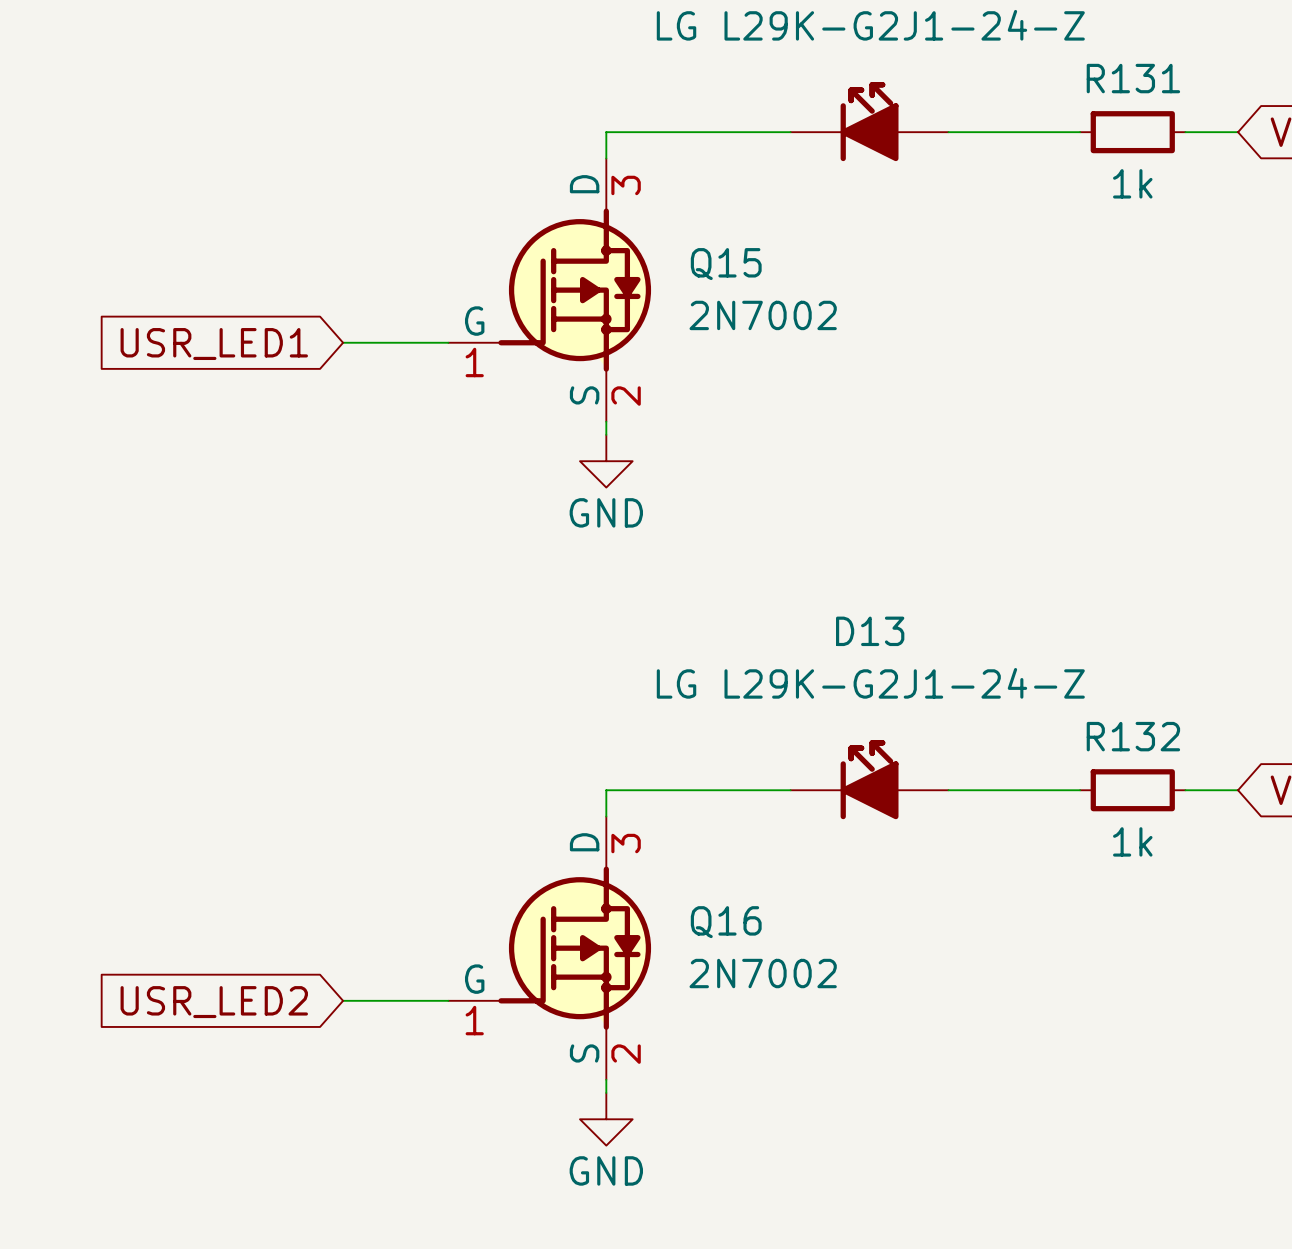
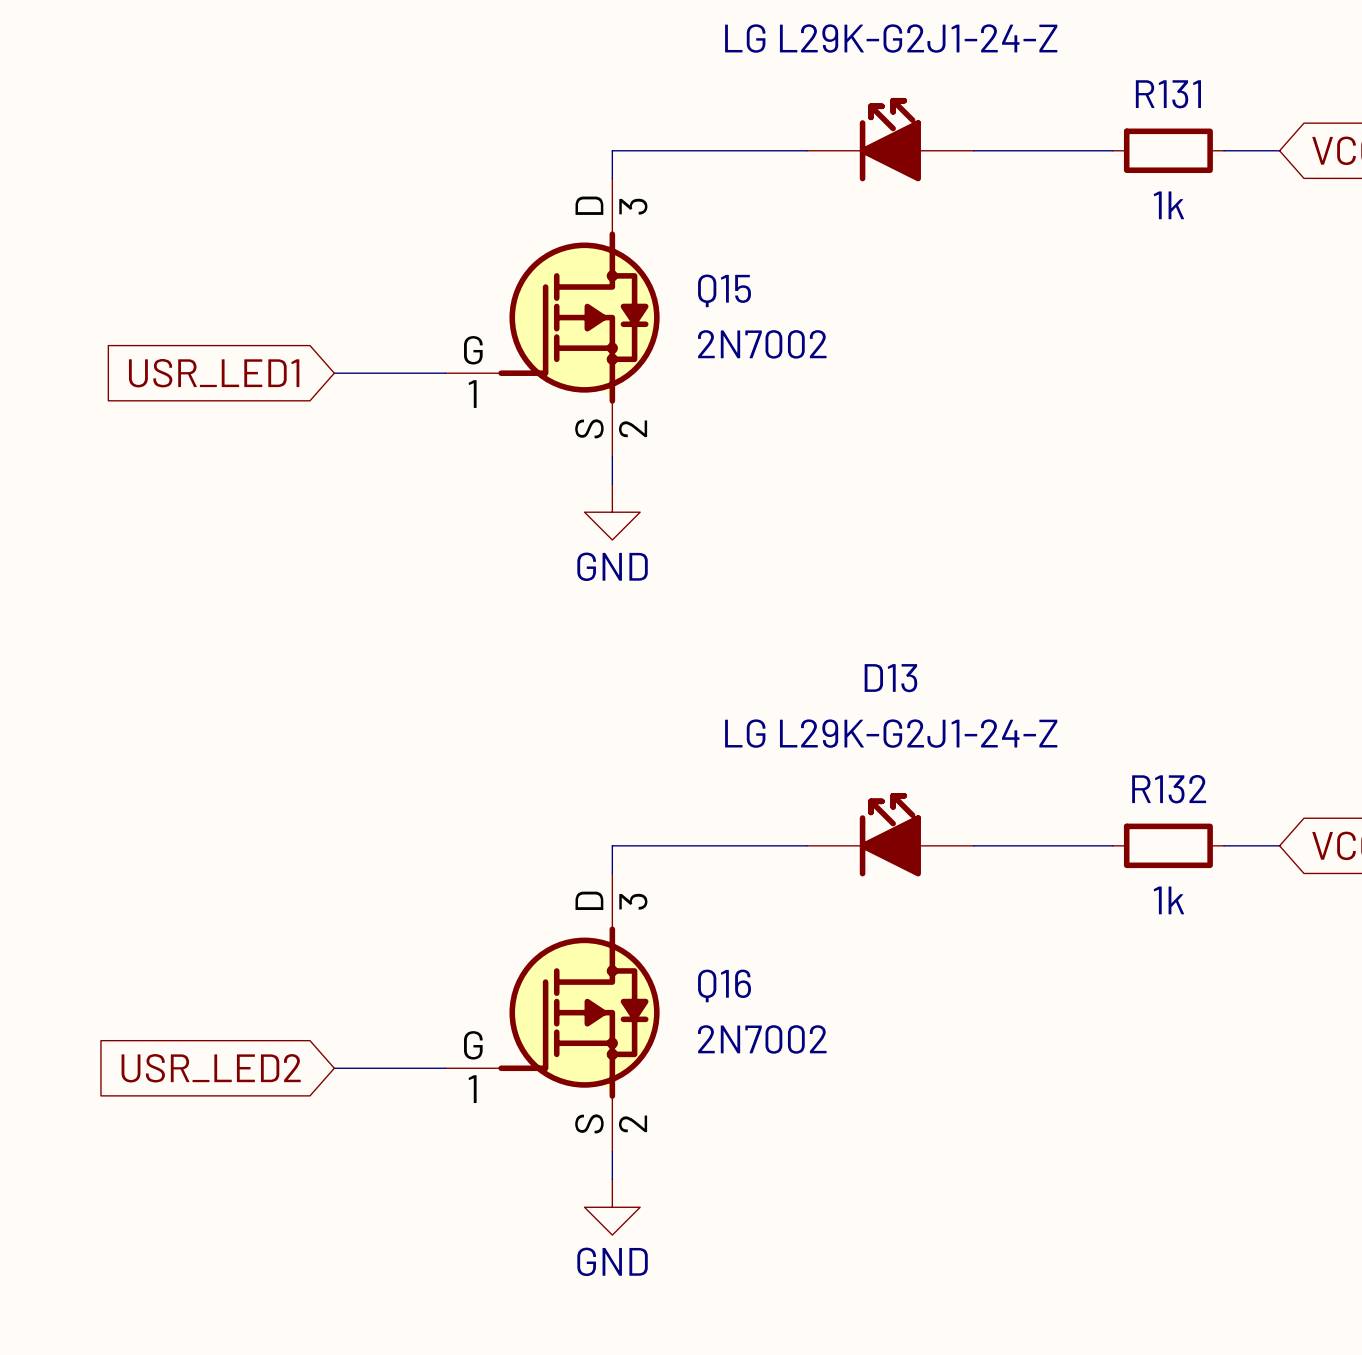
power symbol position: GND (606, 461) -> GND (612, 512)
power symbol position: GND (606, 1119) -> GND (612, 1207)

